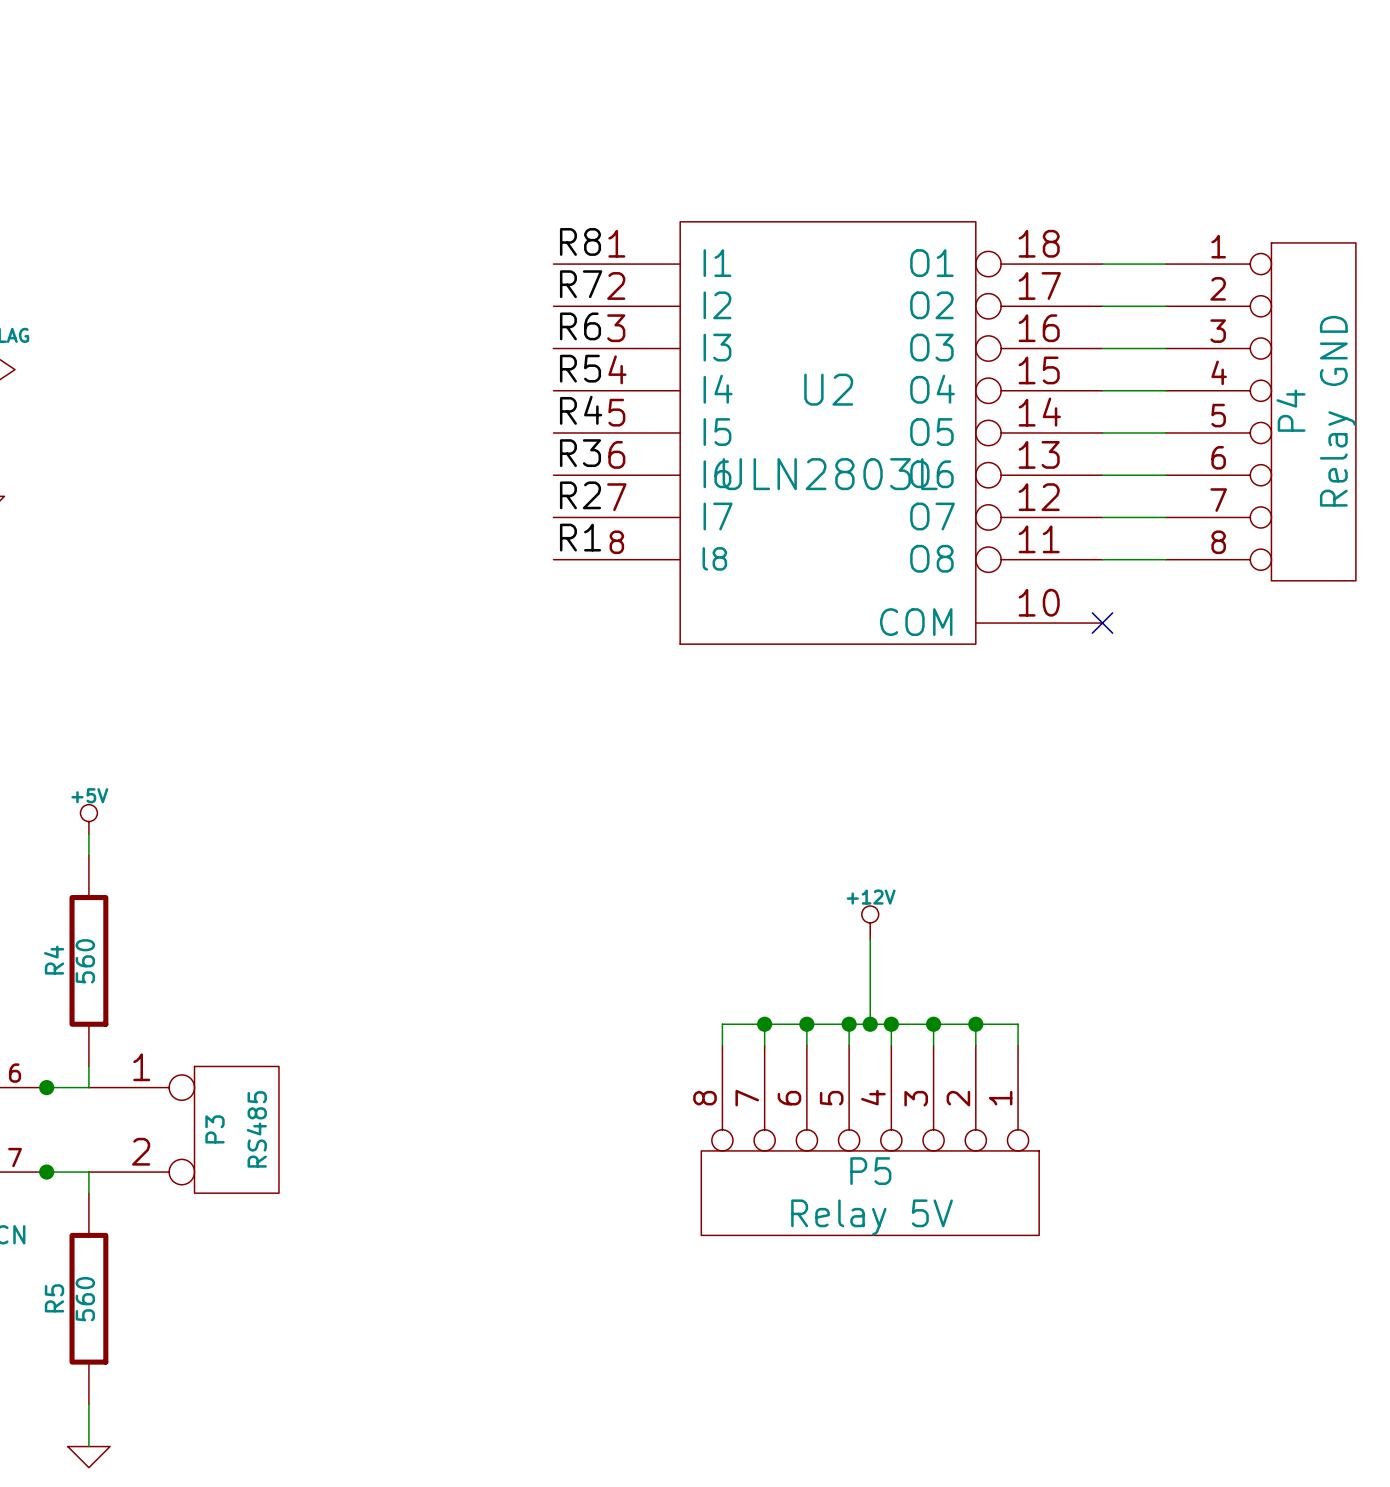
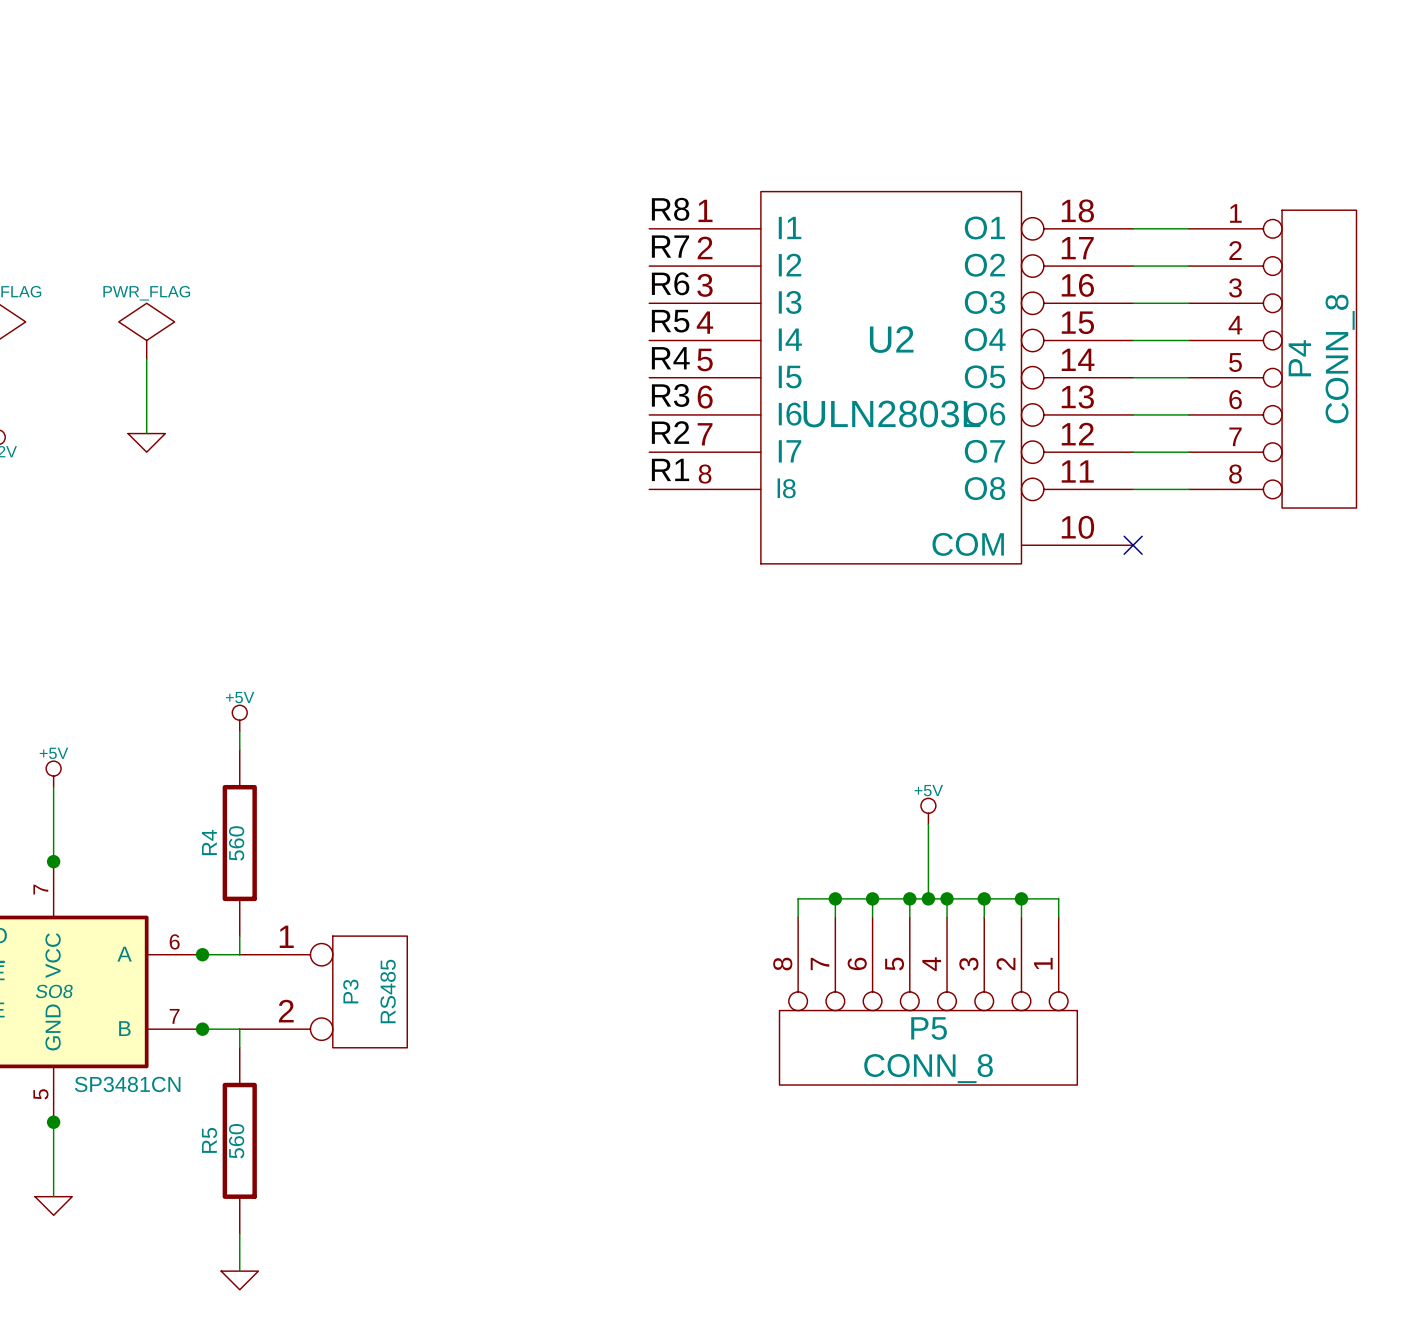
P4 value: Relay GND (1338, 411) -> CONN_8 (1340, 359)
power symbol: +12V (870, 922) -> +5V (928, 811)
P5 value: Relay 5V (872, 1217) -> CONN_8 (928, 1068)

